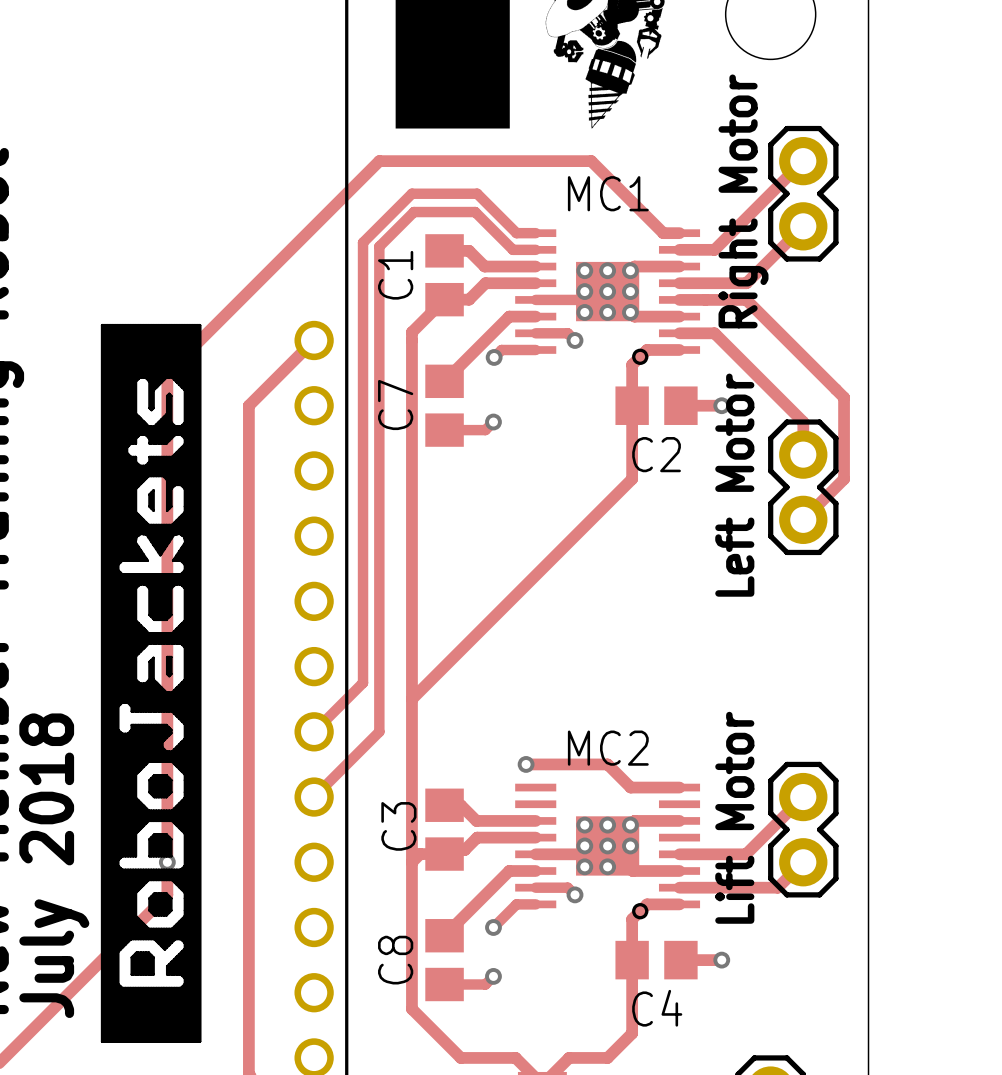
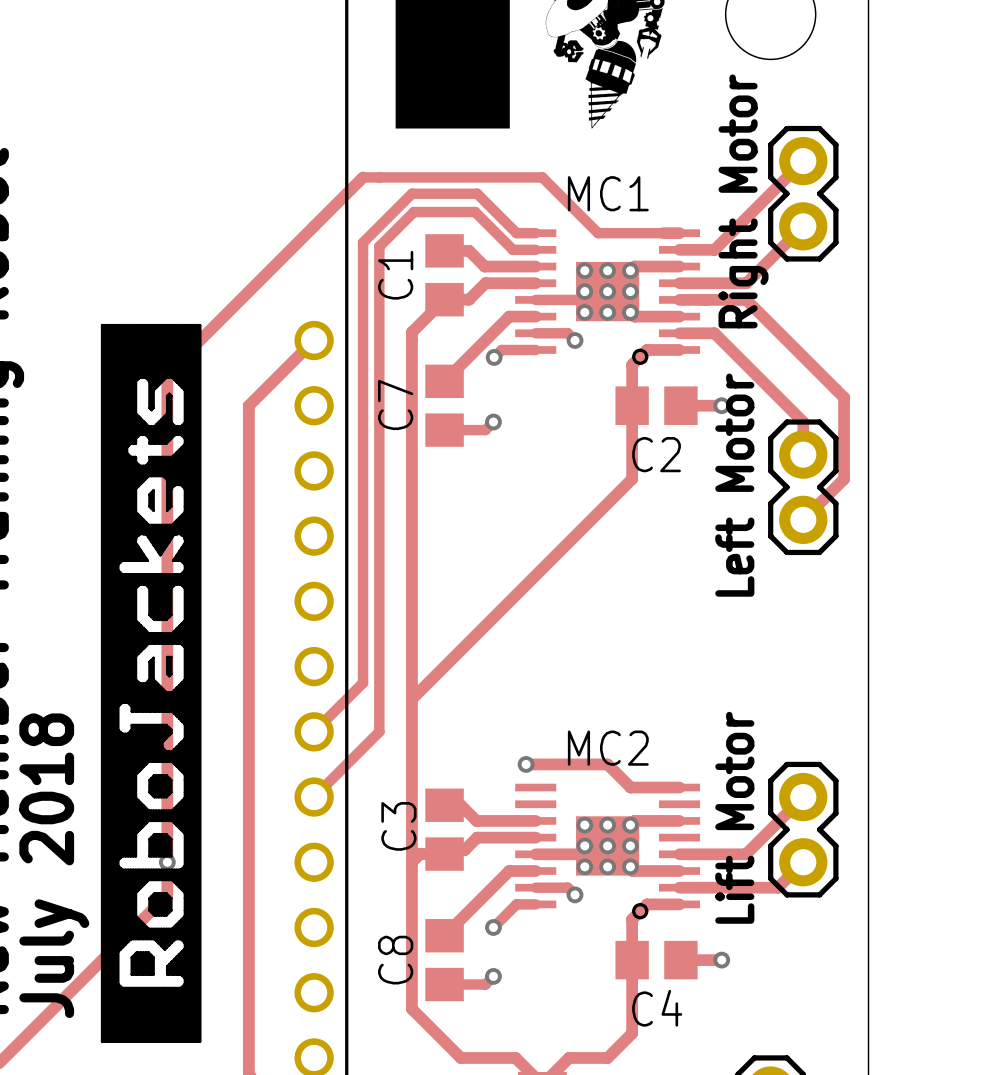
track: (363, 177) (379, 161) (591, 161) (663, 233) -> (363, 177) (542, 177) (598, 233) (663, 233)
via: none -> (630, 866)

